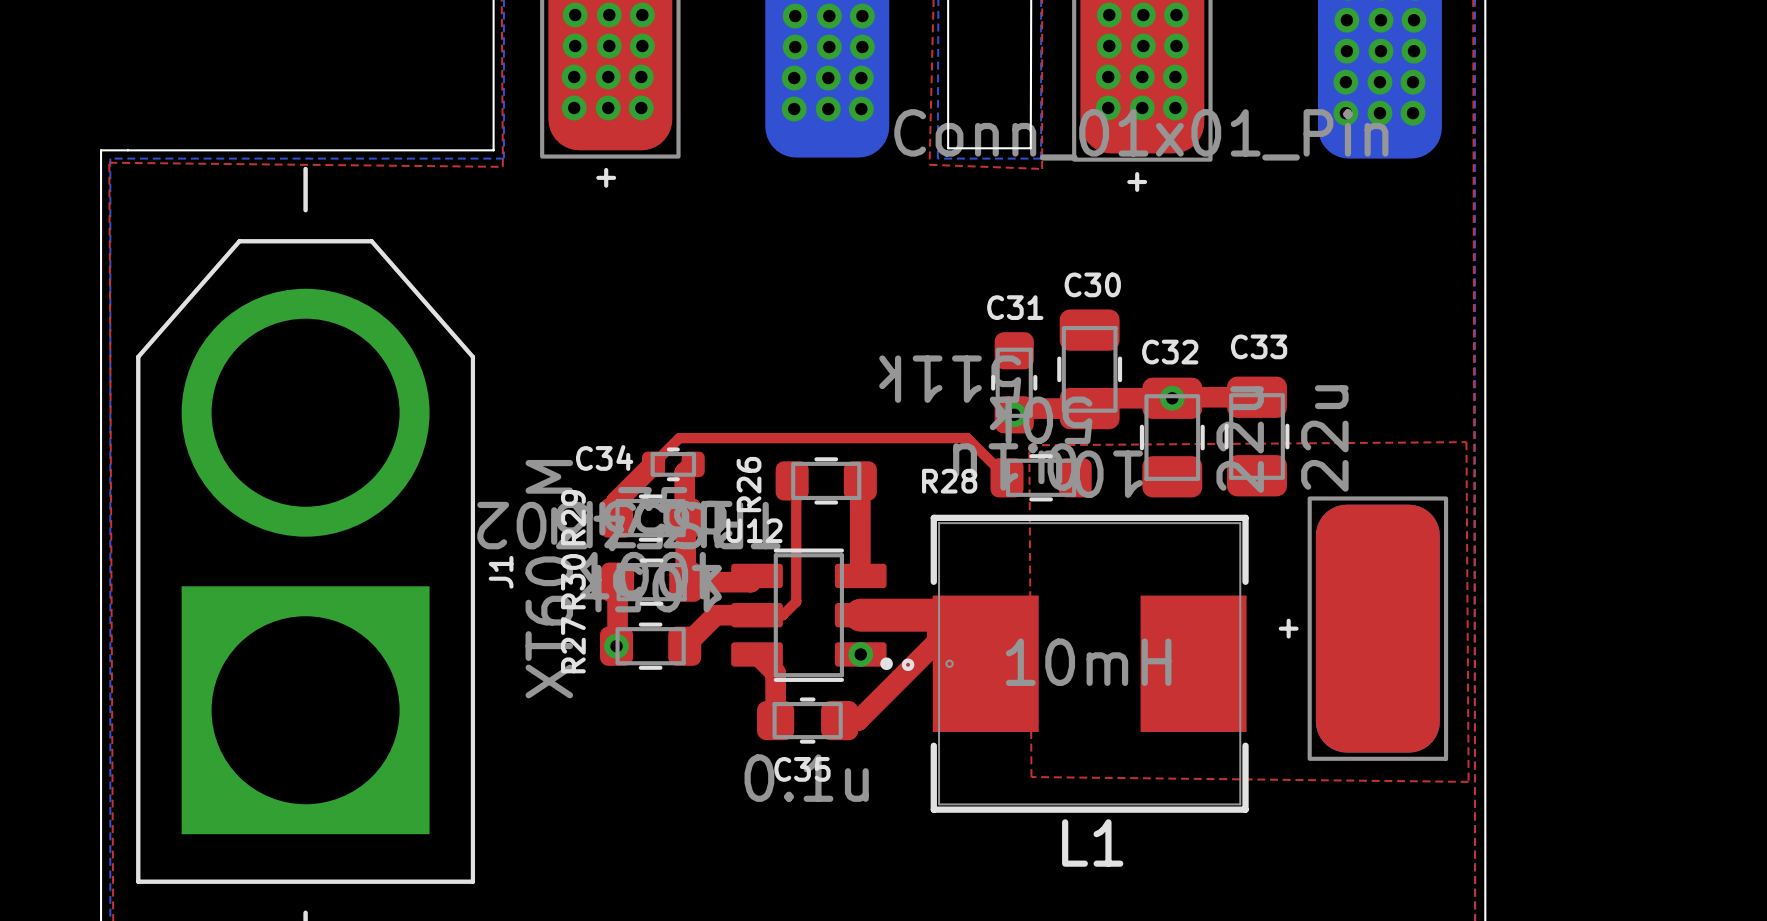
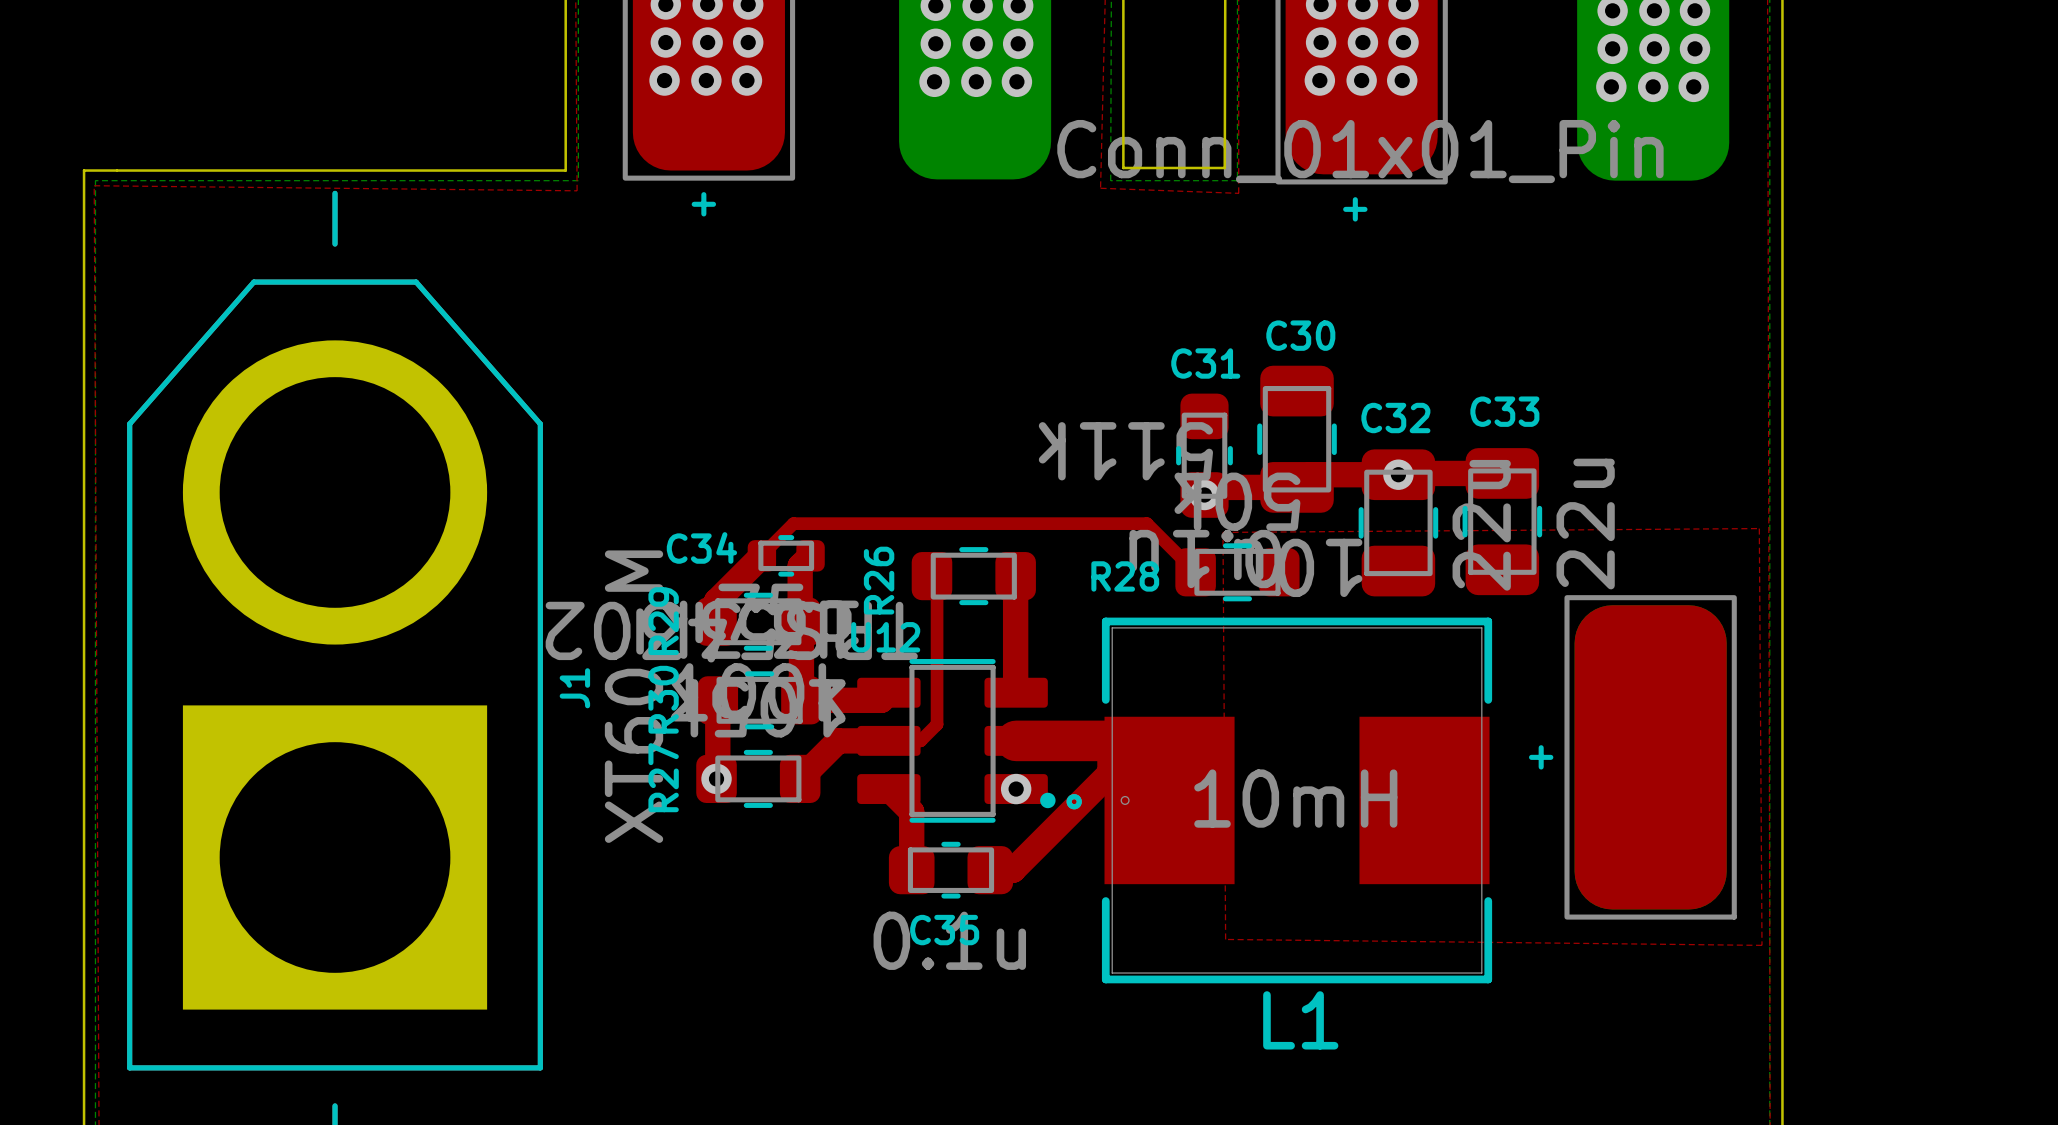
via: (574, 107) -> none
via: (608, 107) -> none
via: (641, 107) -> none
via: (1108, 107) -> none
via: (1142, 107) -> none
via: (1175, 107) -> none
via: (794, 109) -> none
via: (828, 109) -> none
via: (861, 109) -> none
via: (1345, 113) -> none
via: (1379, 113) -> none
via: (1413, 113) -> none

